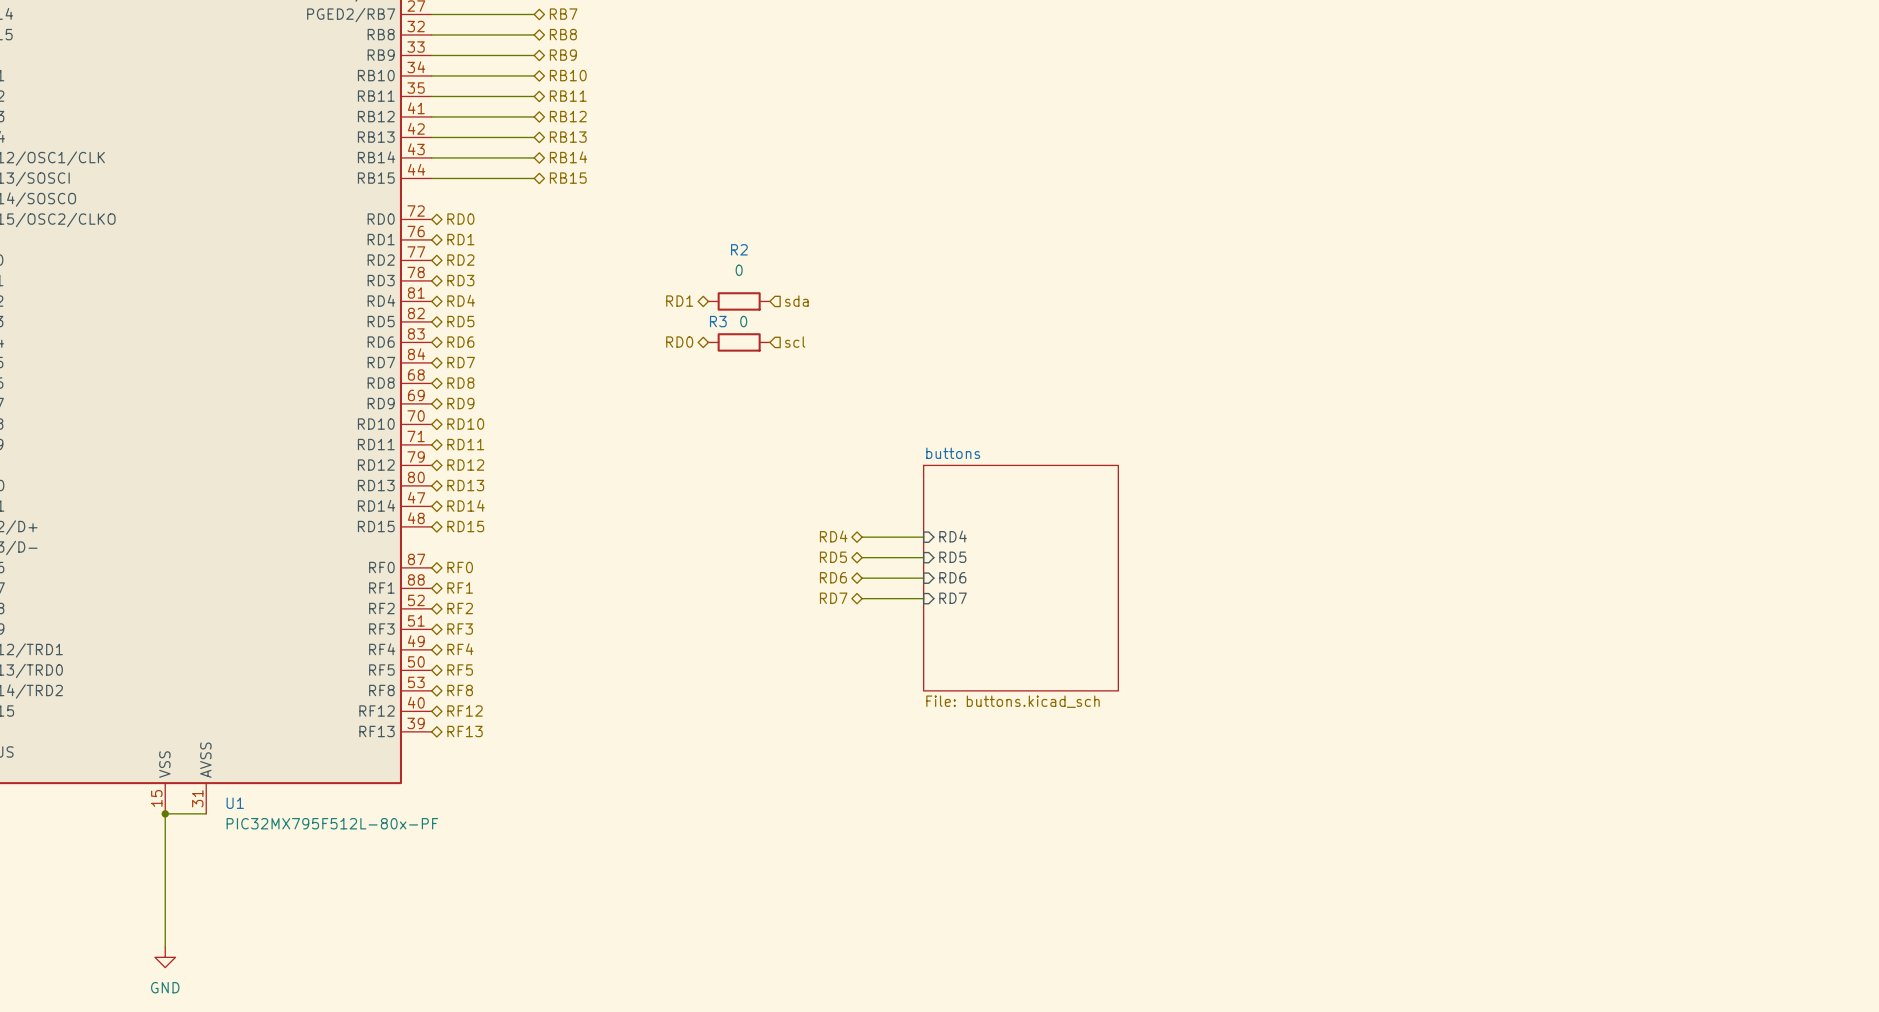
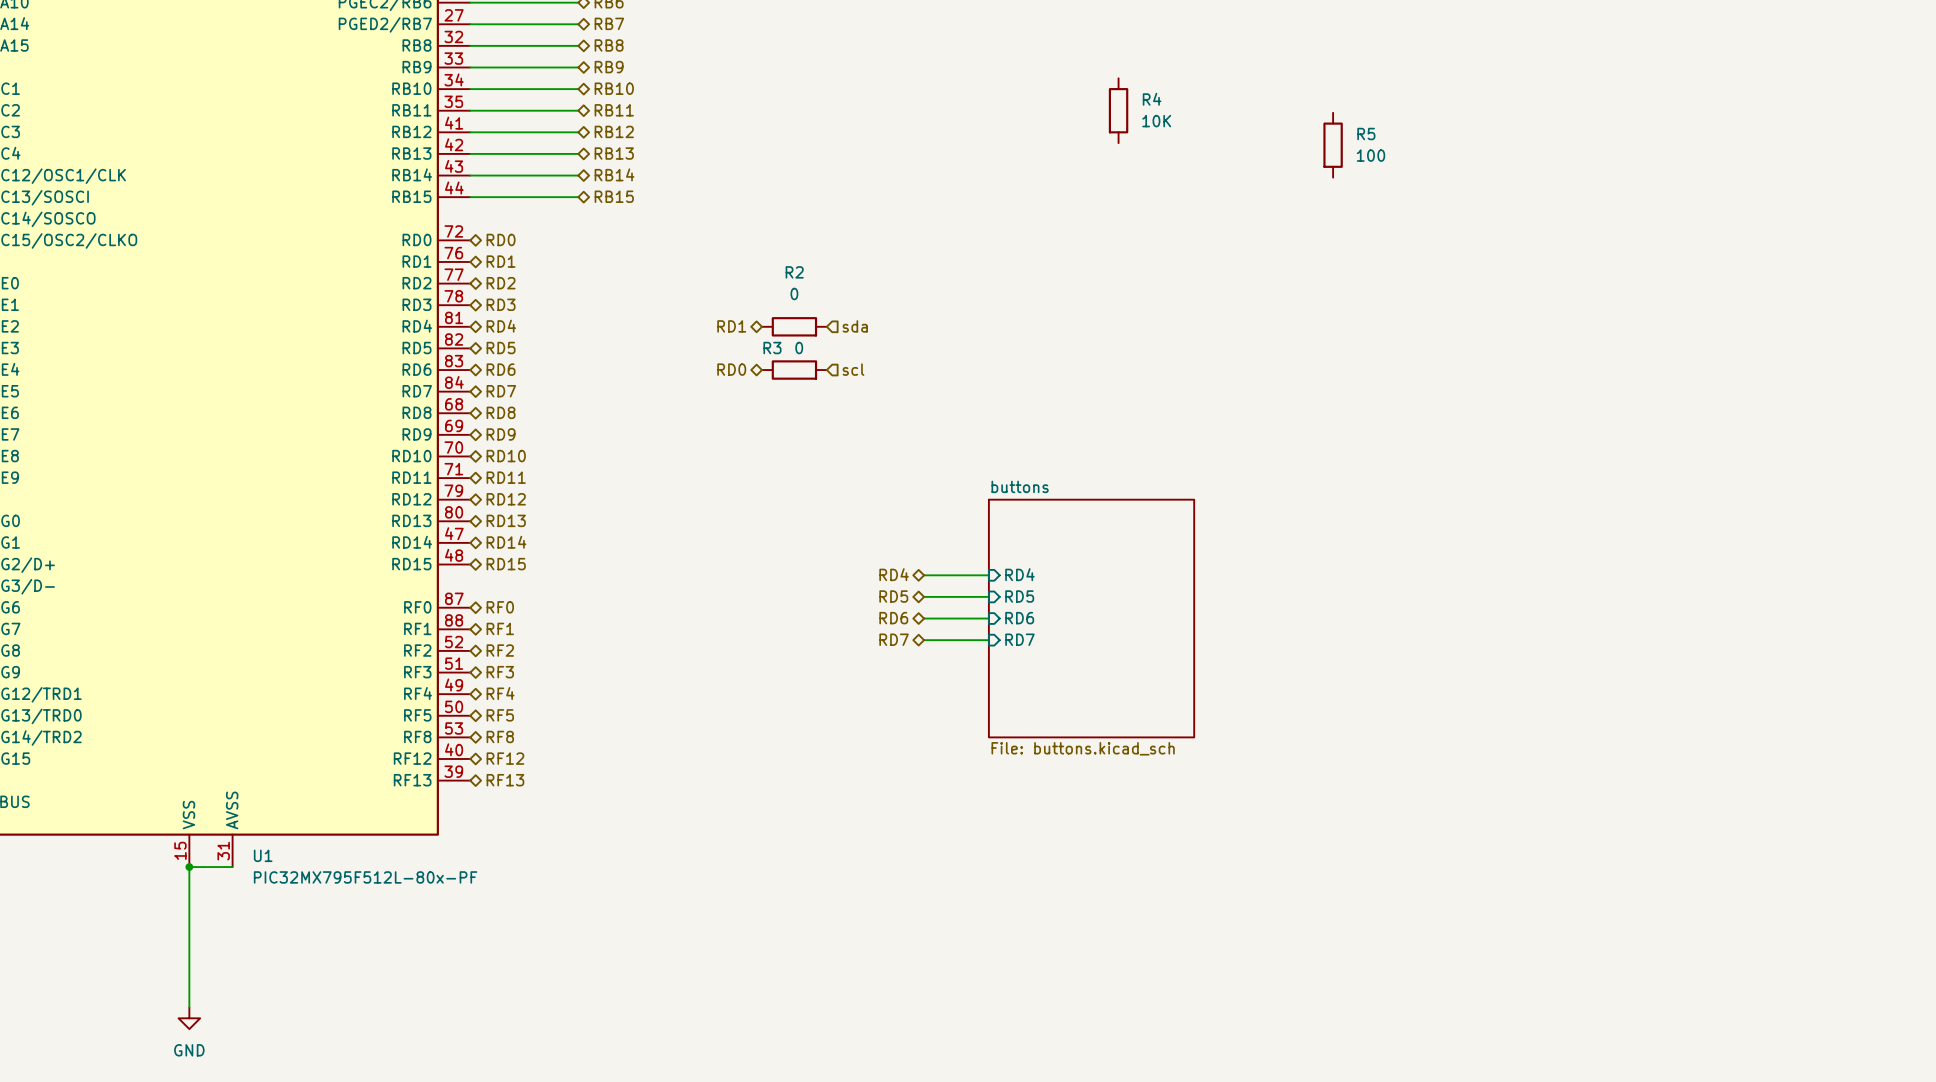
R4: none -> 10K (1118, 110)
R5: none -> 100 (1333, 145)

